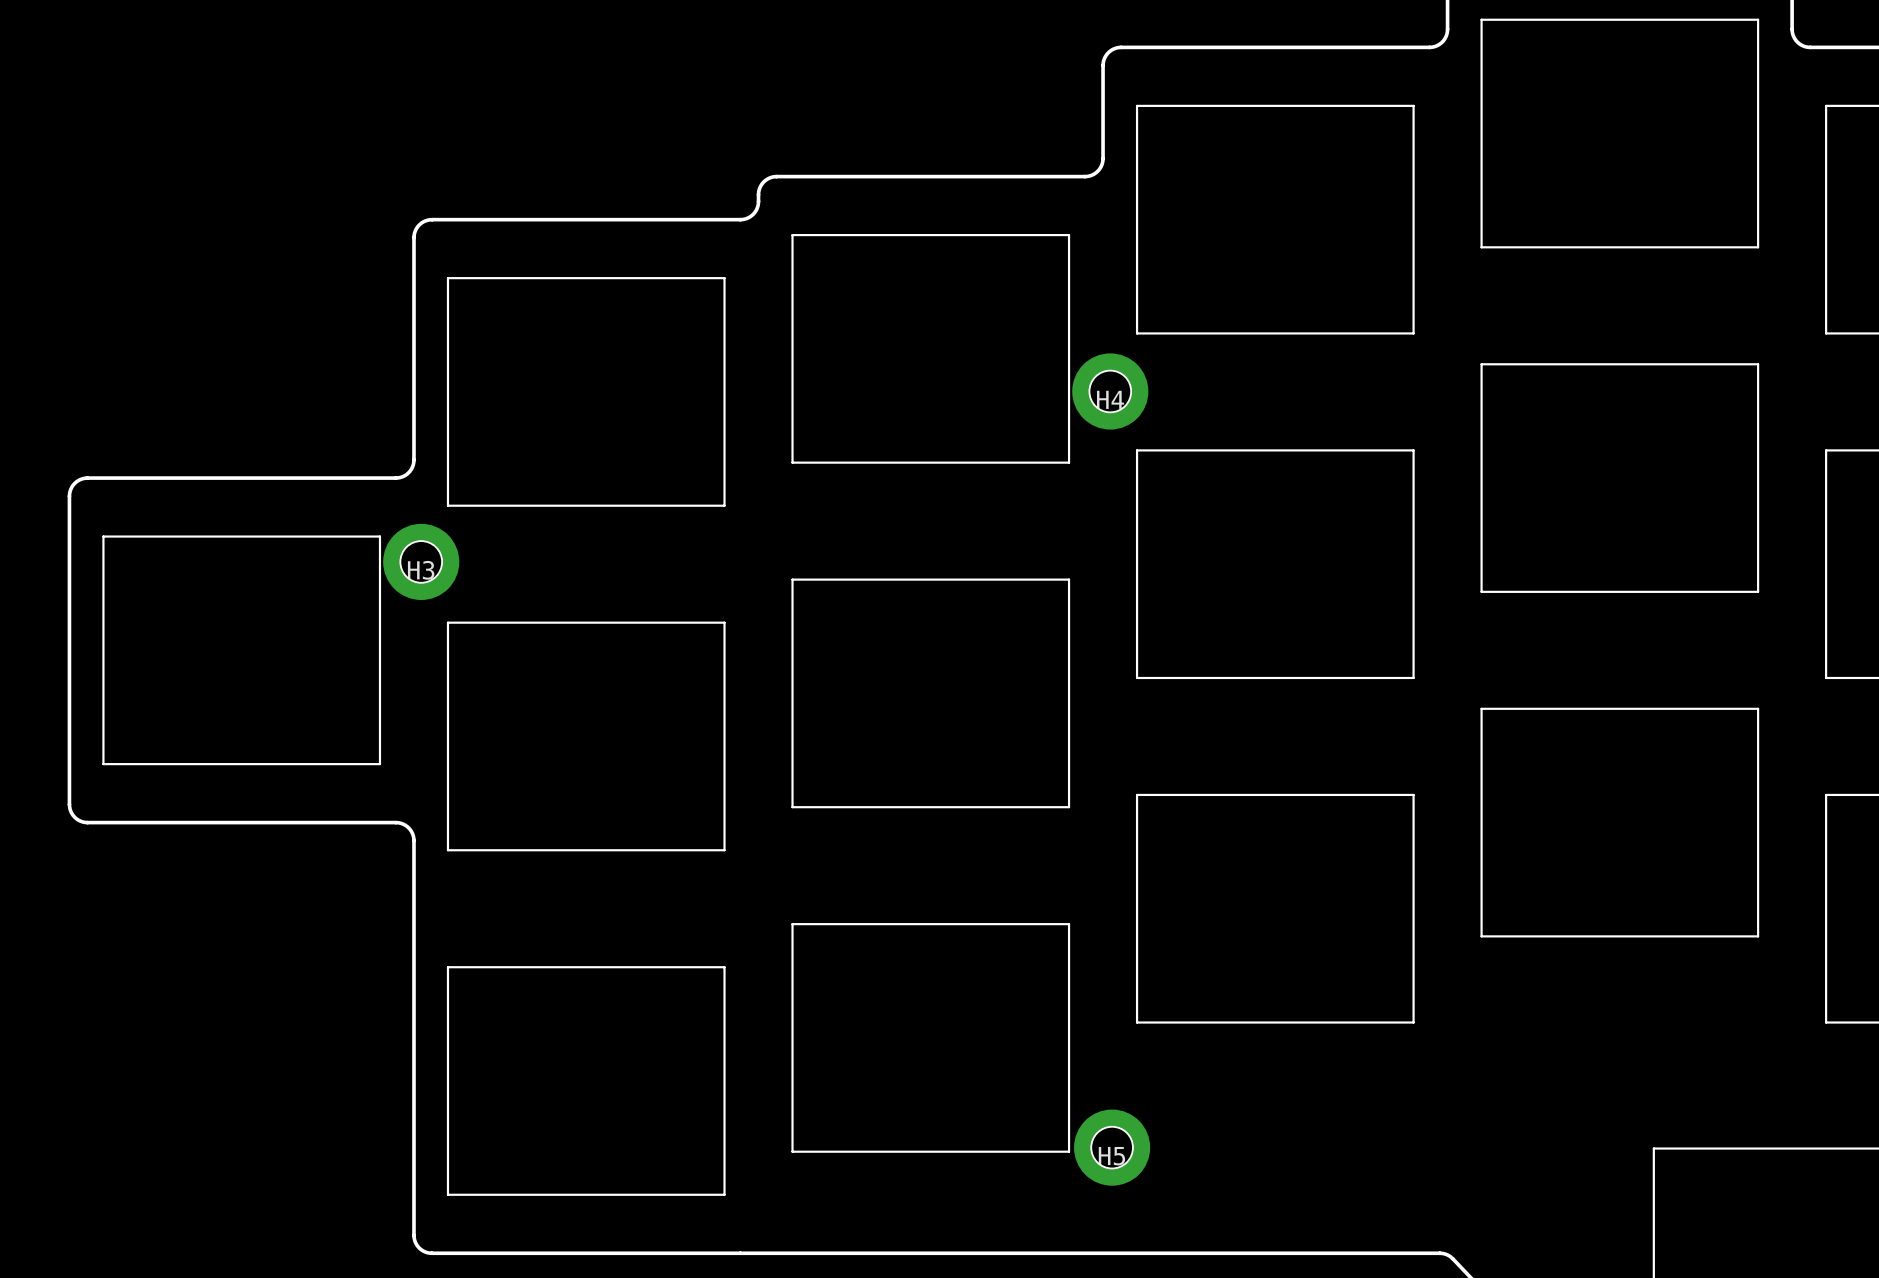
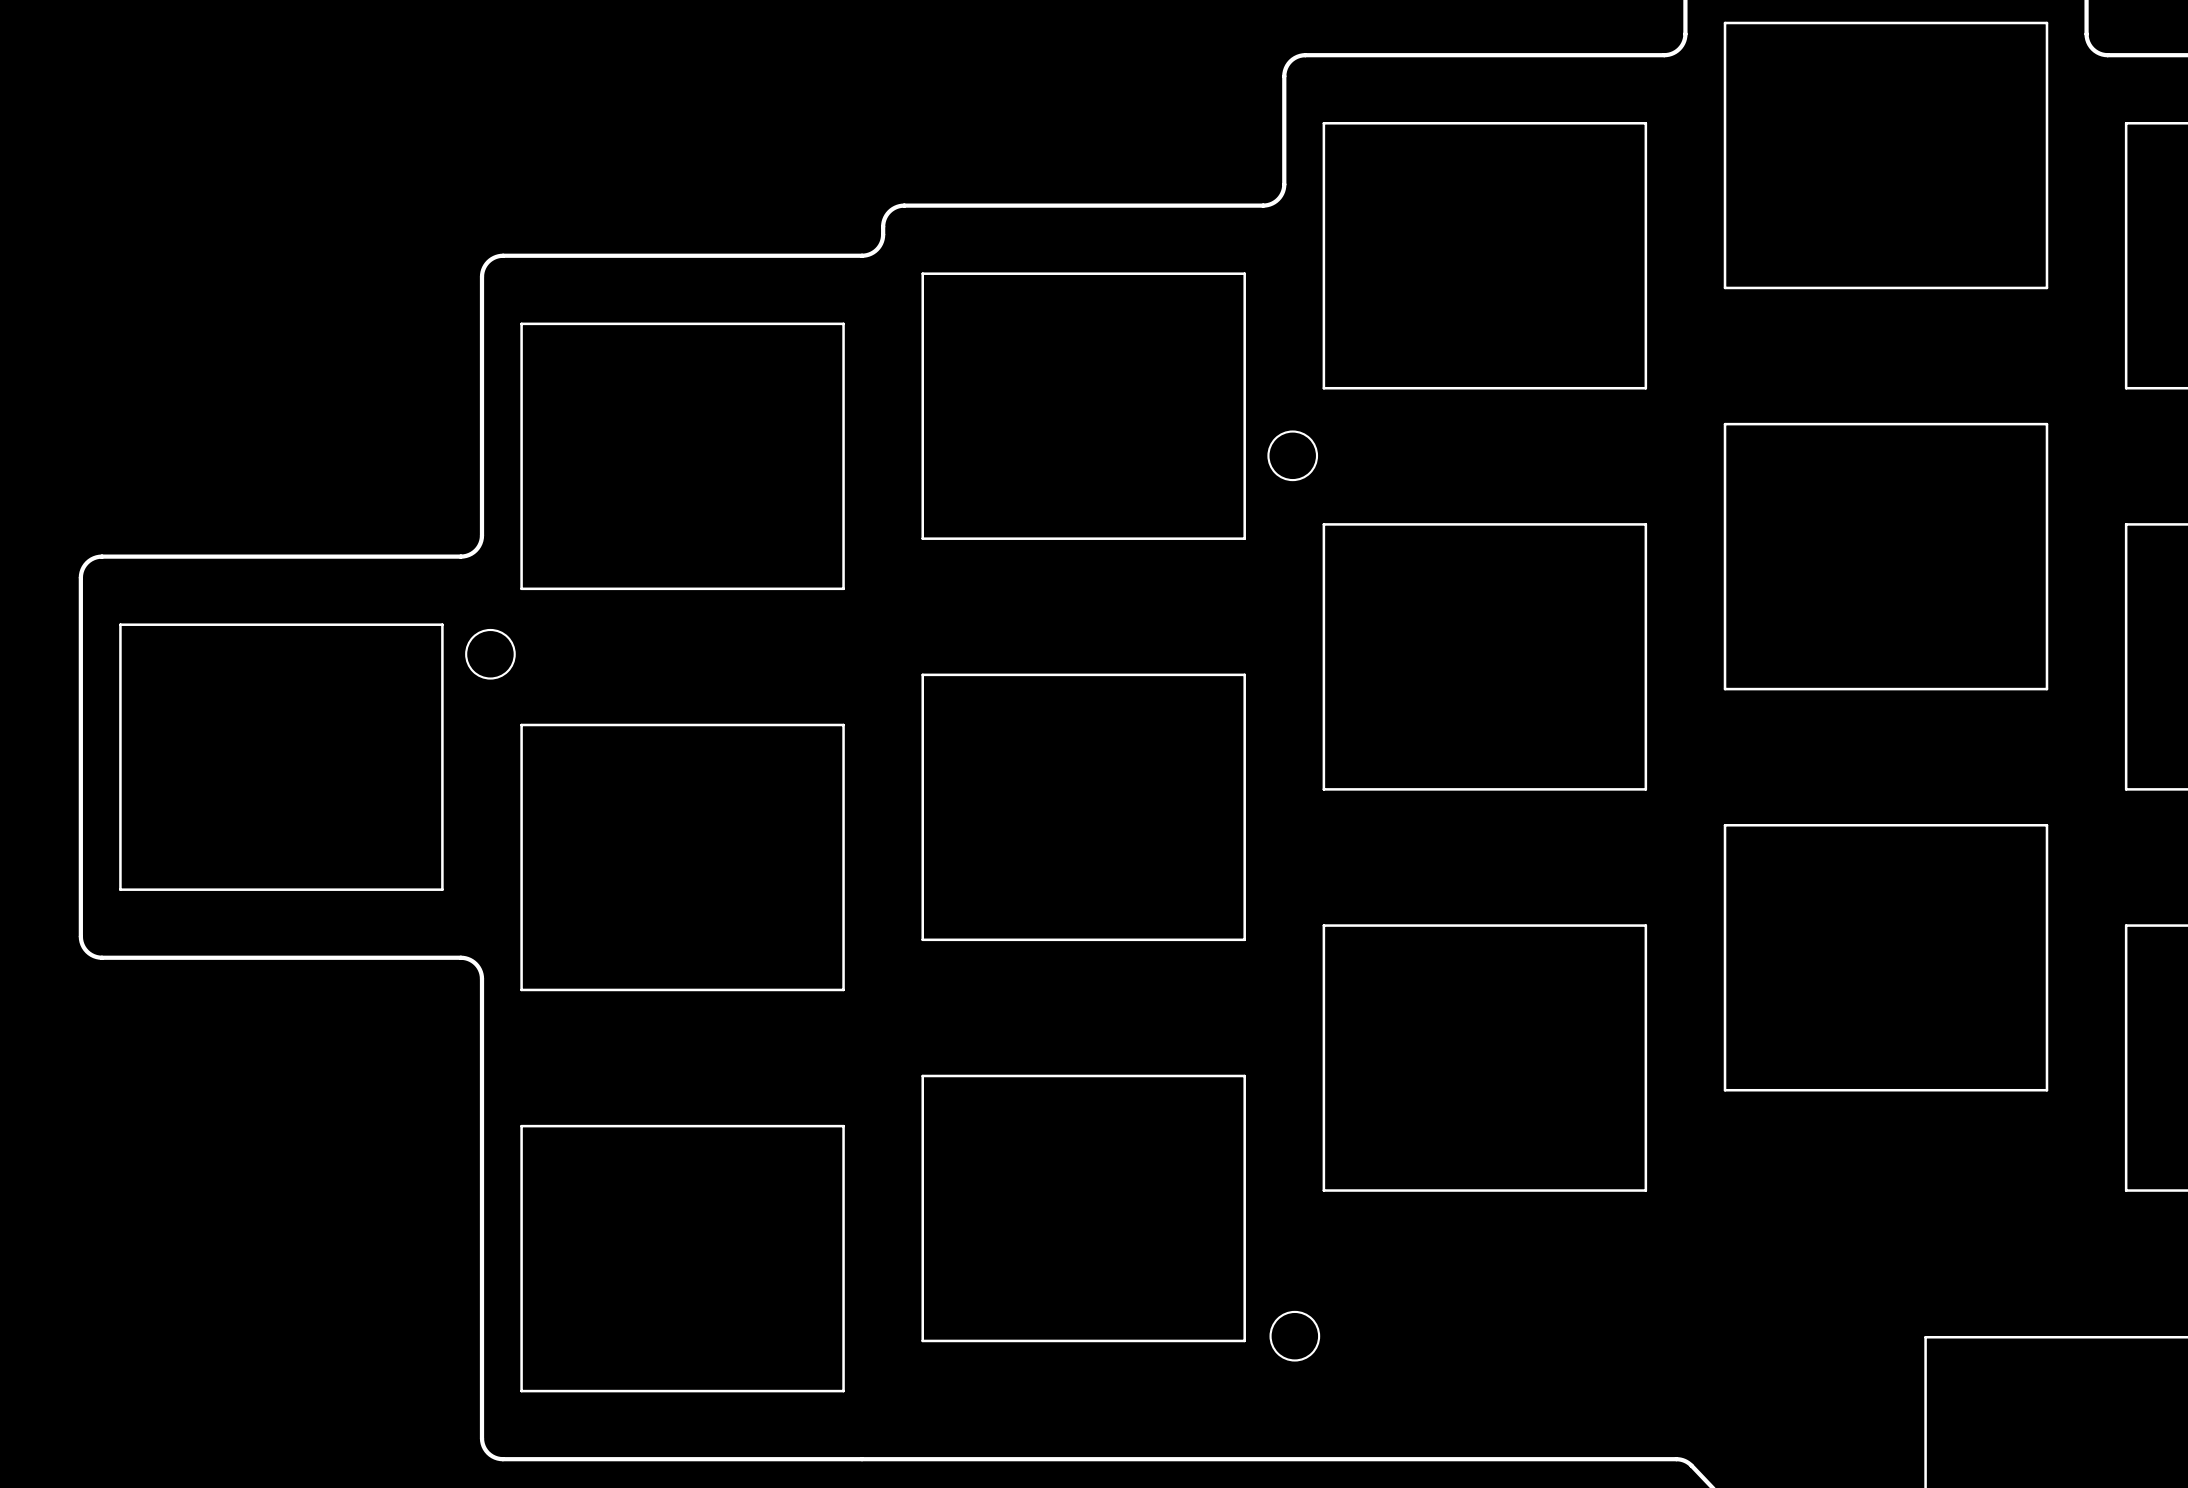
drawing: none -> [1267, 430, 1319, 482]
H4: (1110, 391) -> none
drawing: none -> [465, 628, 516, 680]
H3: (421, 561) -> none
drawing: none -> [1269, 1310, 1321, 1362]
H5: (1112, 1147) -> none

